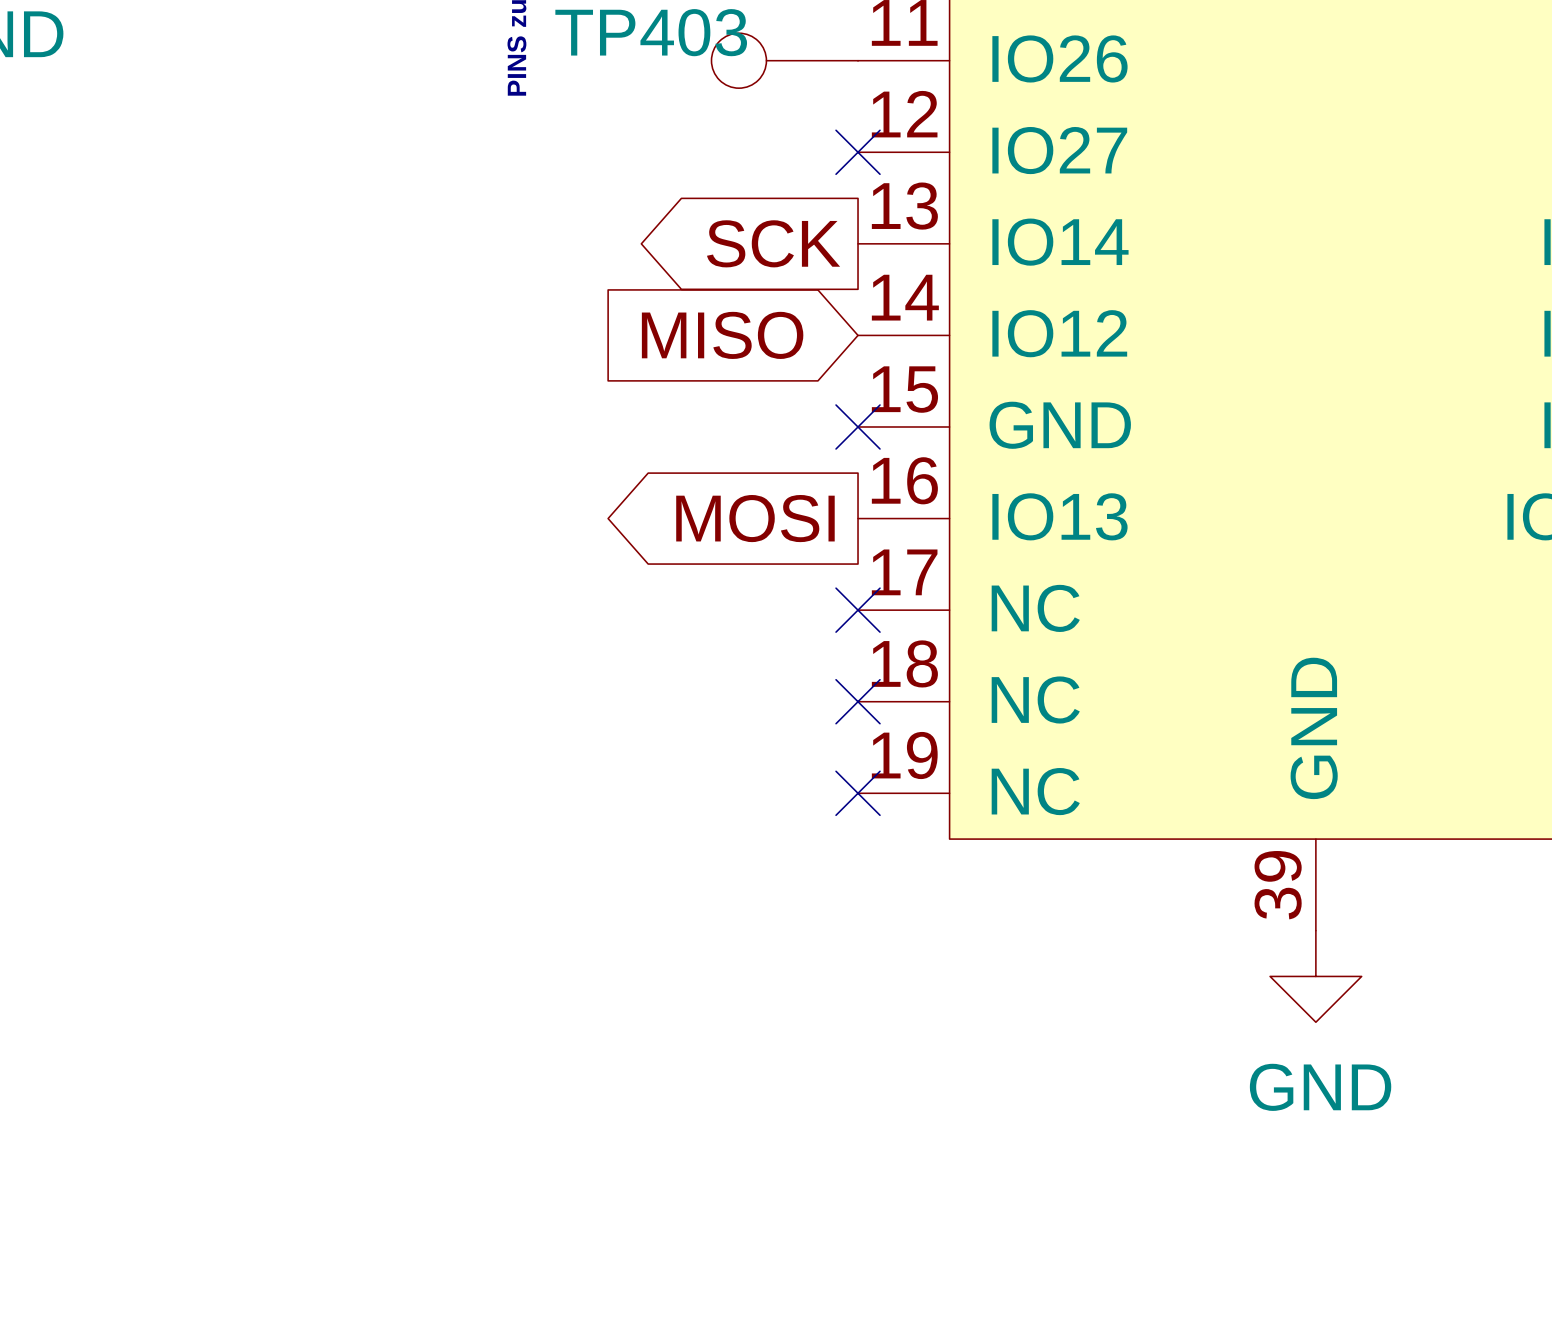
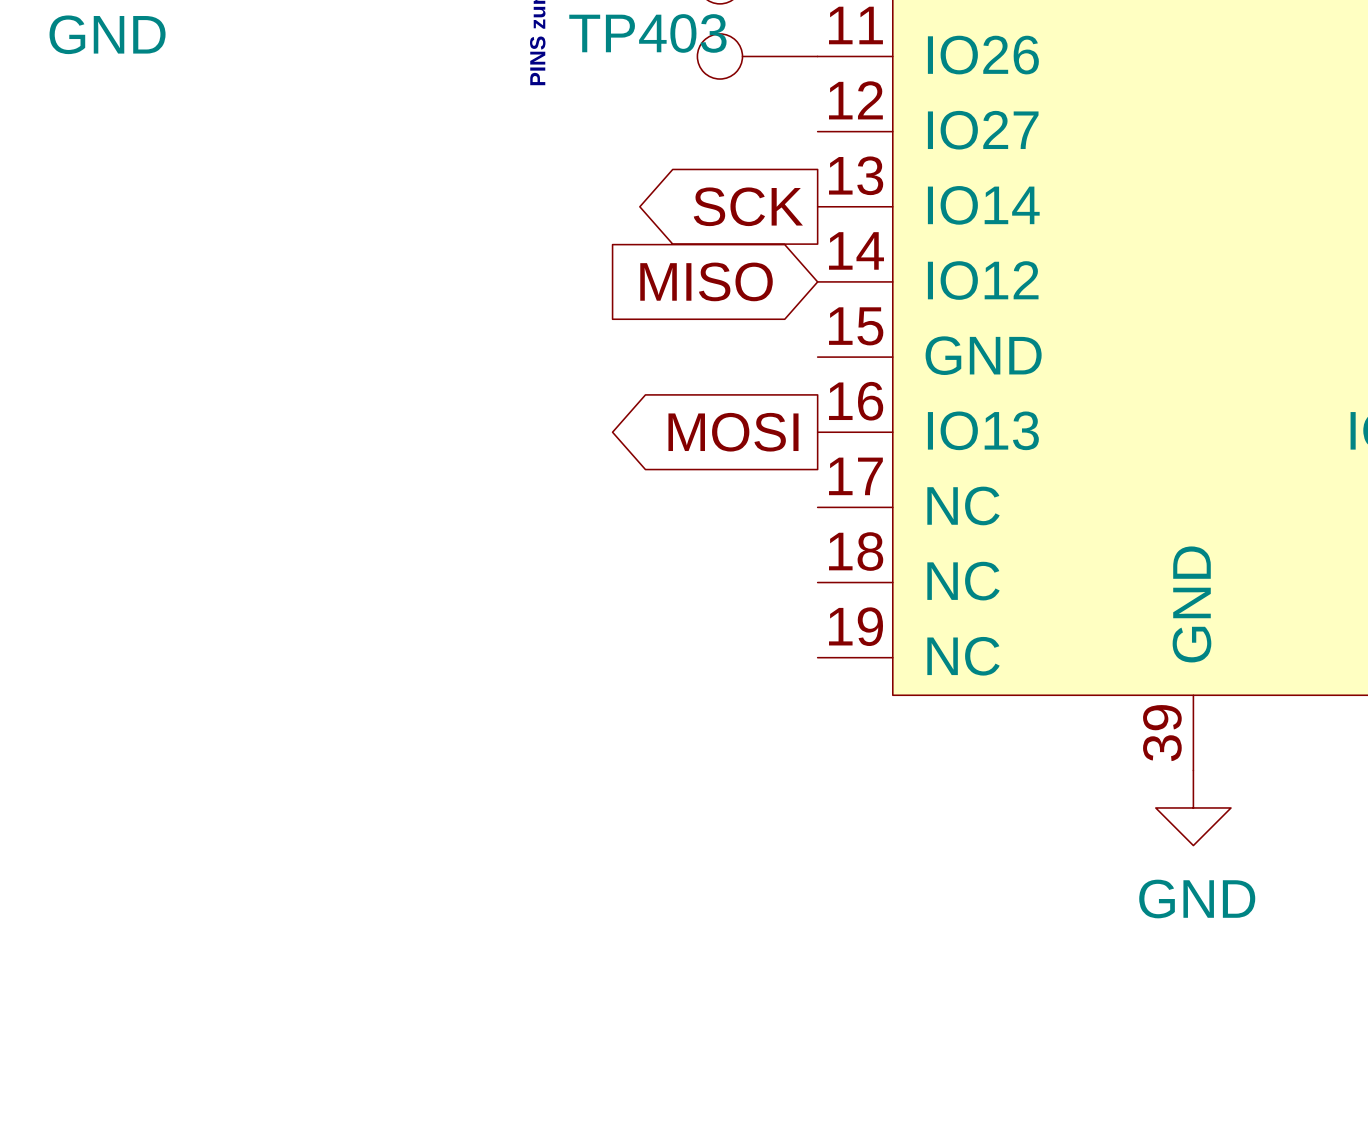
no-connect mark: (858, 152) -> none
no-connect mark: (858, 426) -> none
no-connect mark: (858, 610) -> none
no-connect mark: (858, 701) -> none
no-connect mark: (858, 793) -> none

